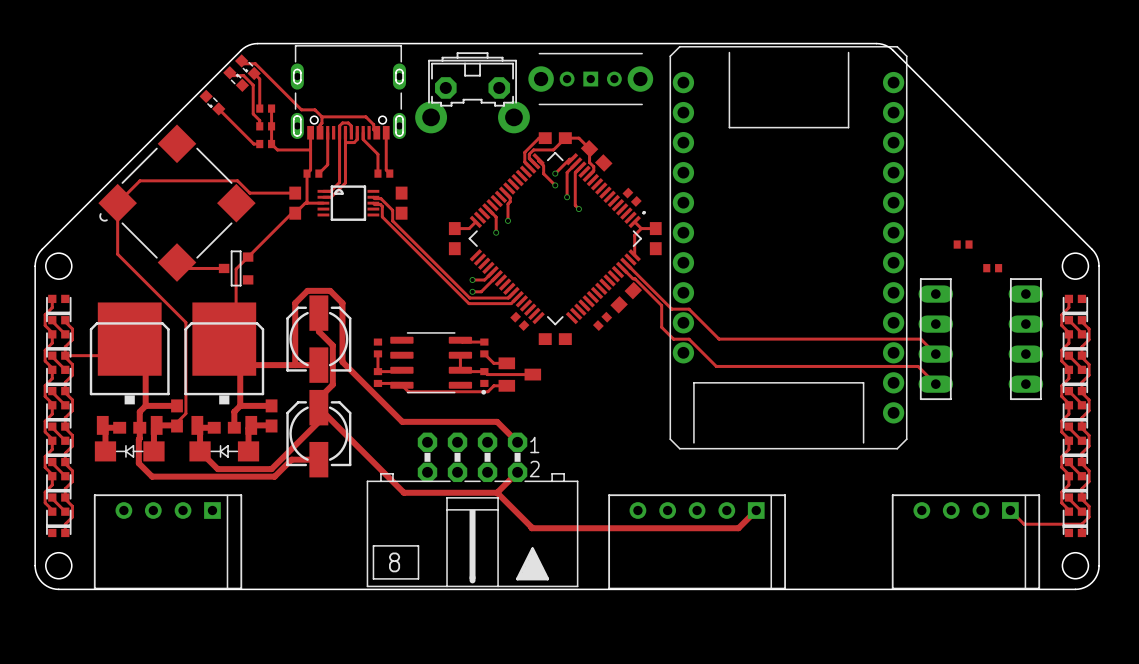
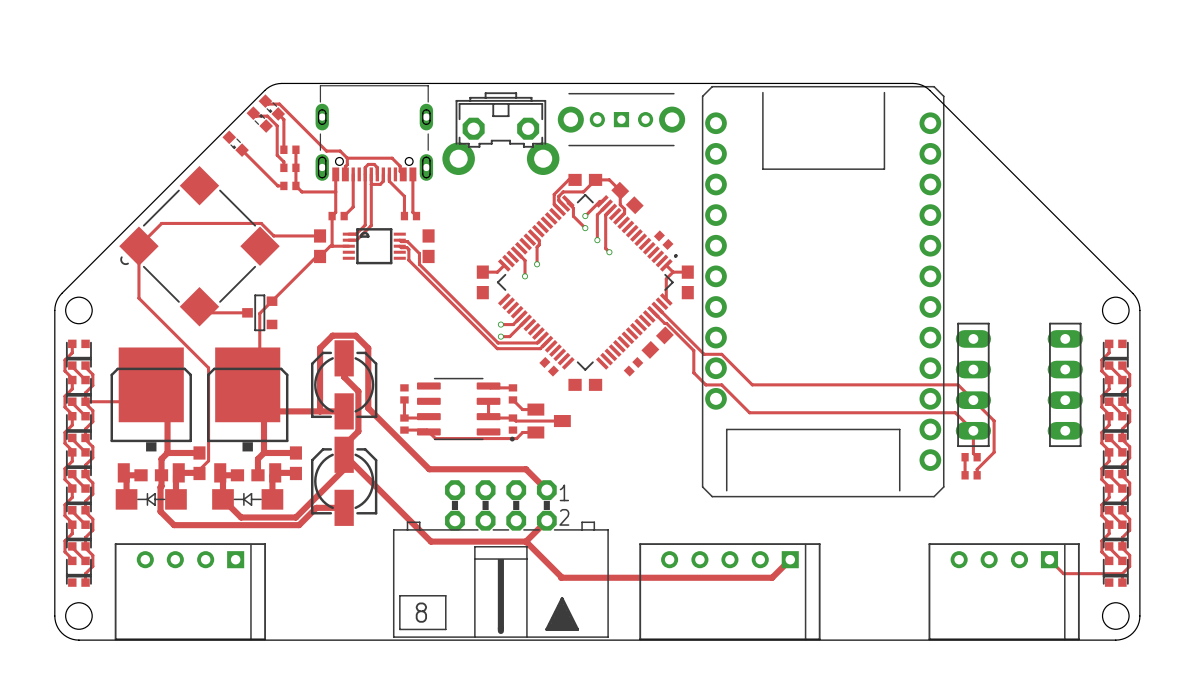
part: (963, 244) -> none
part: (992, 268) -> none
track: none -> (973, 400) (994, 420) (994, 452) (977, 469) (977, 475)
track: none -> (973, 430) (973, 453) (977, 457)
track: none -> (965, 457) (965, 475)
part: none -> (971, 457)
part: none -> (971, 475)

